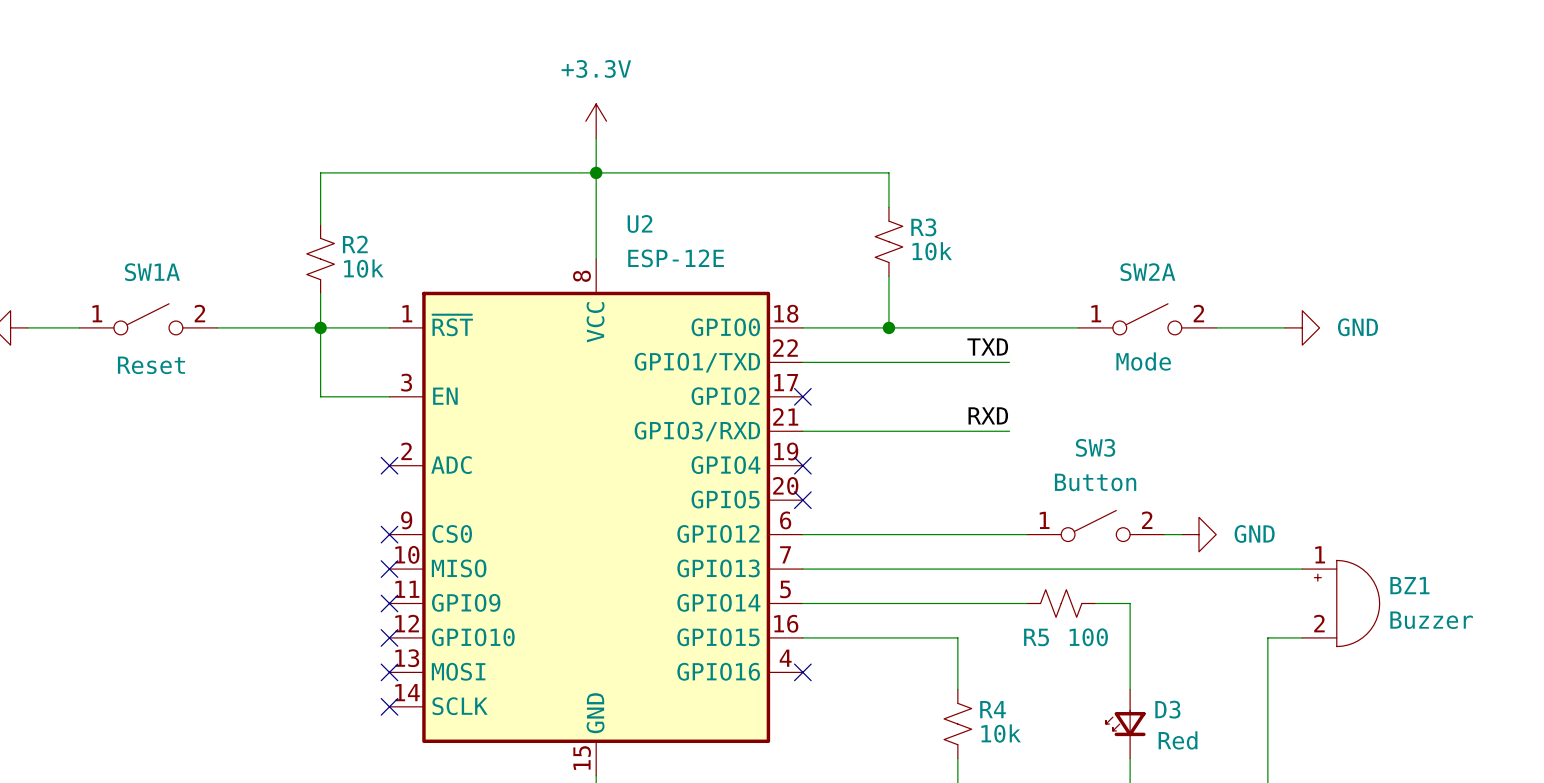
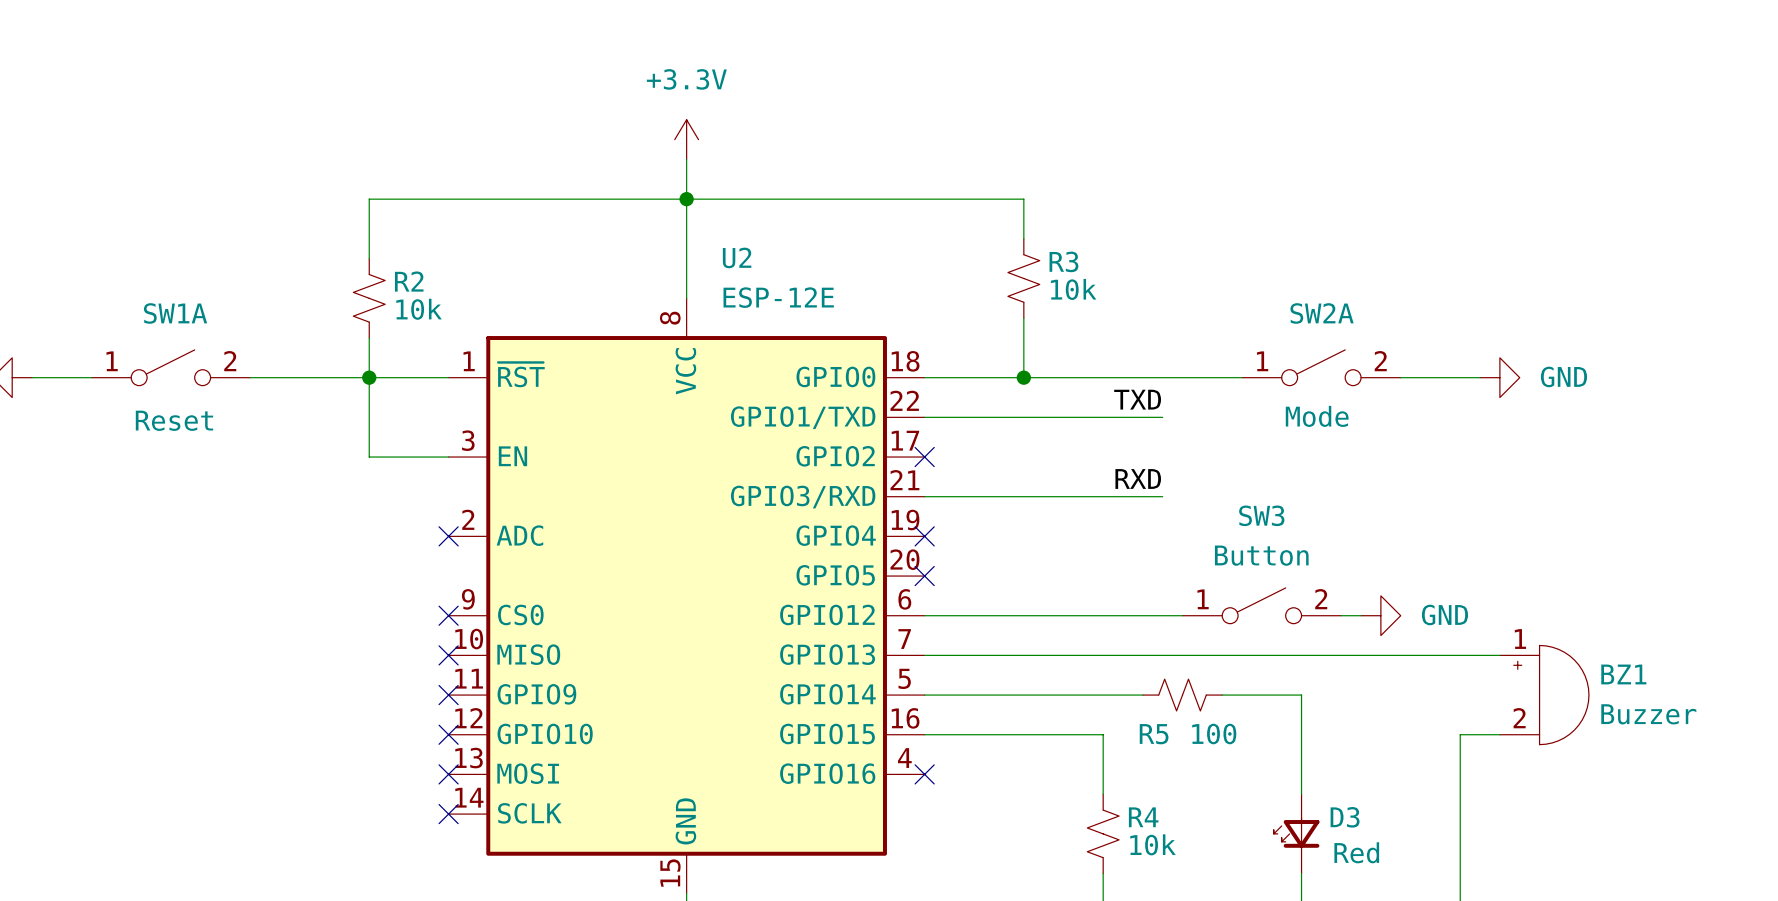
wire: (992, 603) (1026, 603) -> (1222, 695) (1261, 695)
R5 position: (1061, 603) -> (1182, 695)

